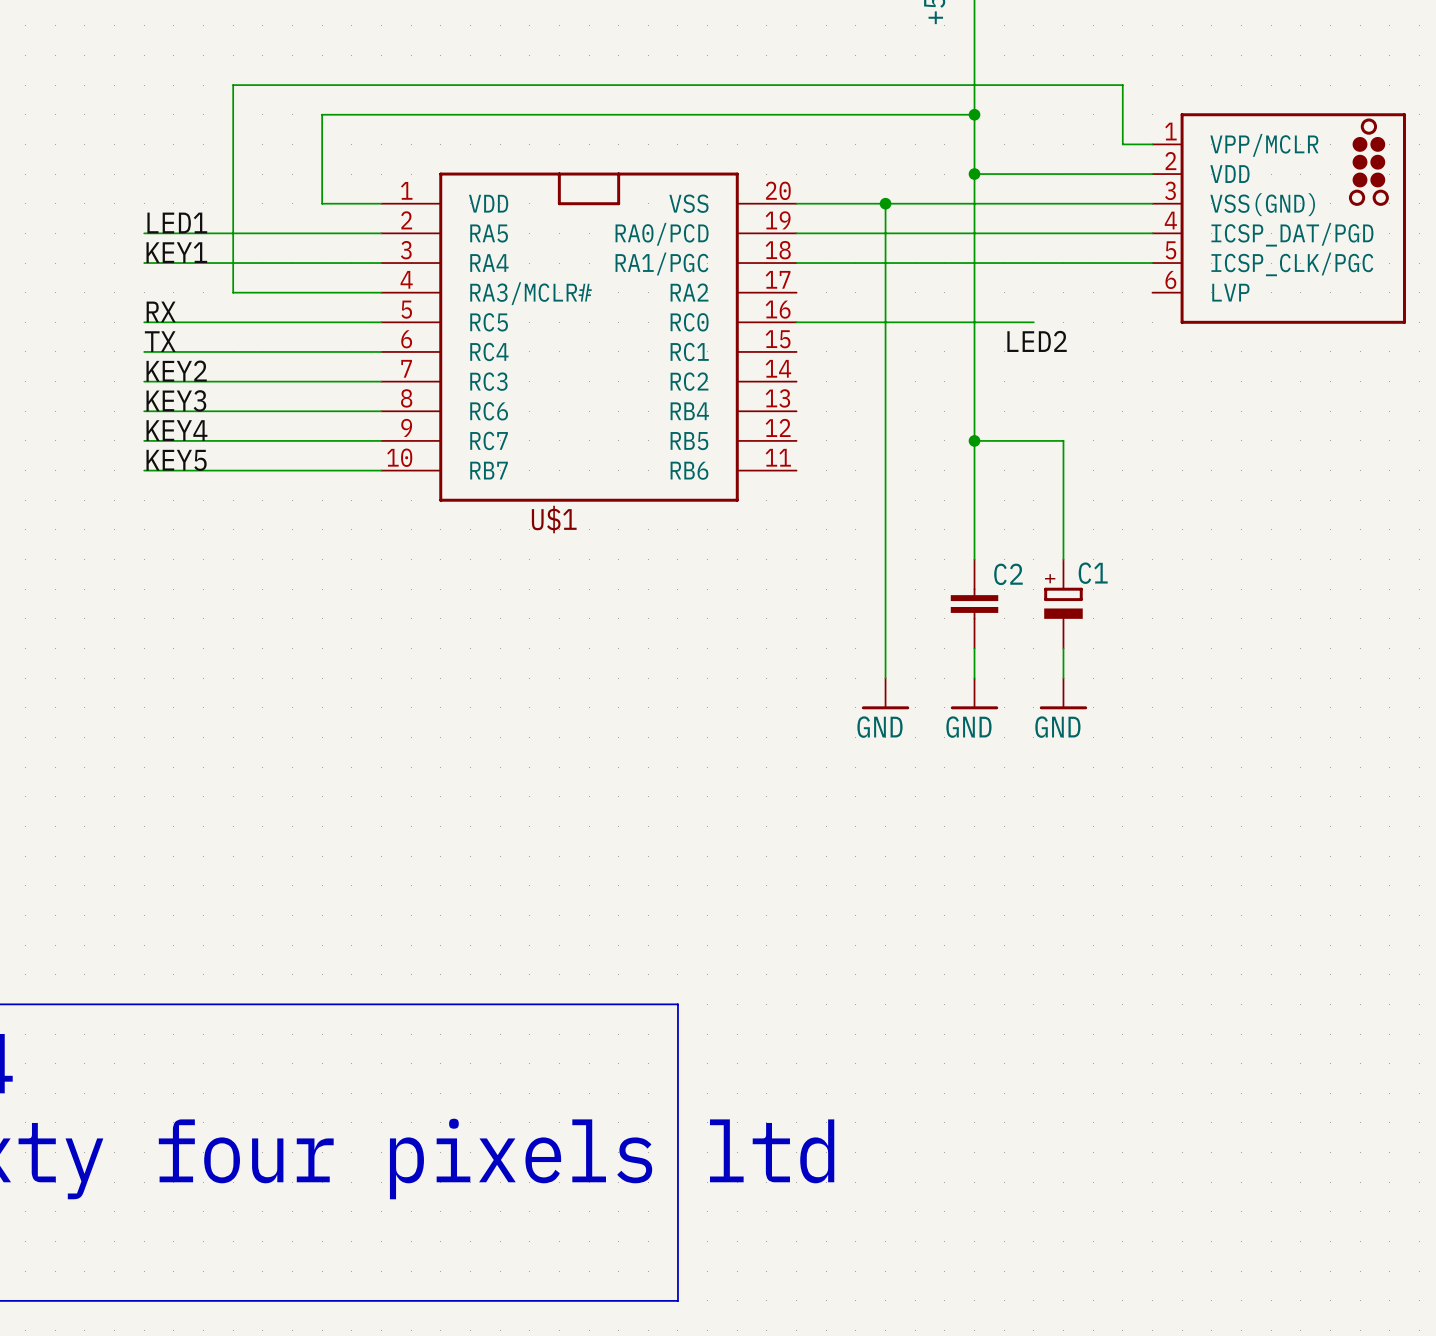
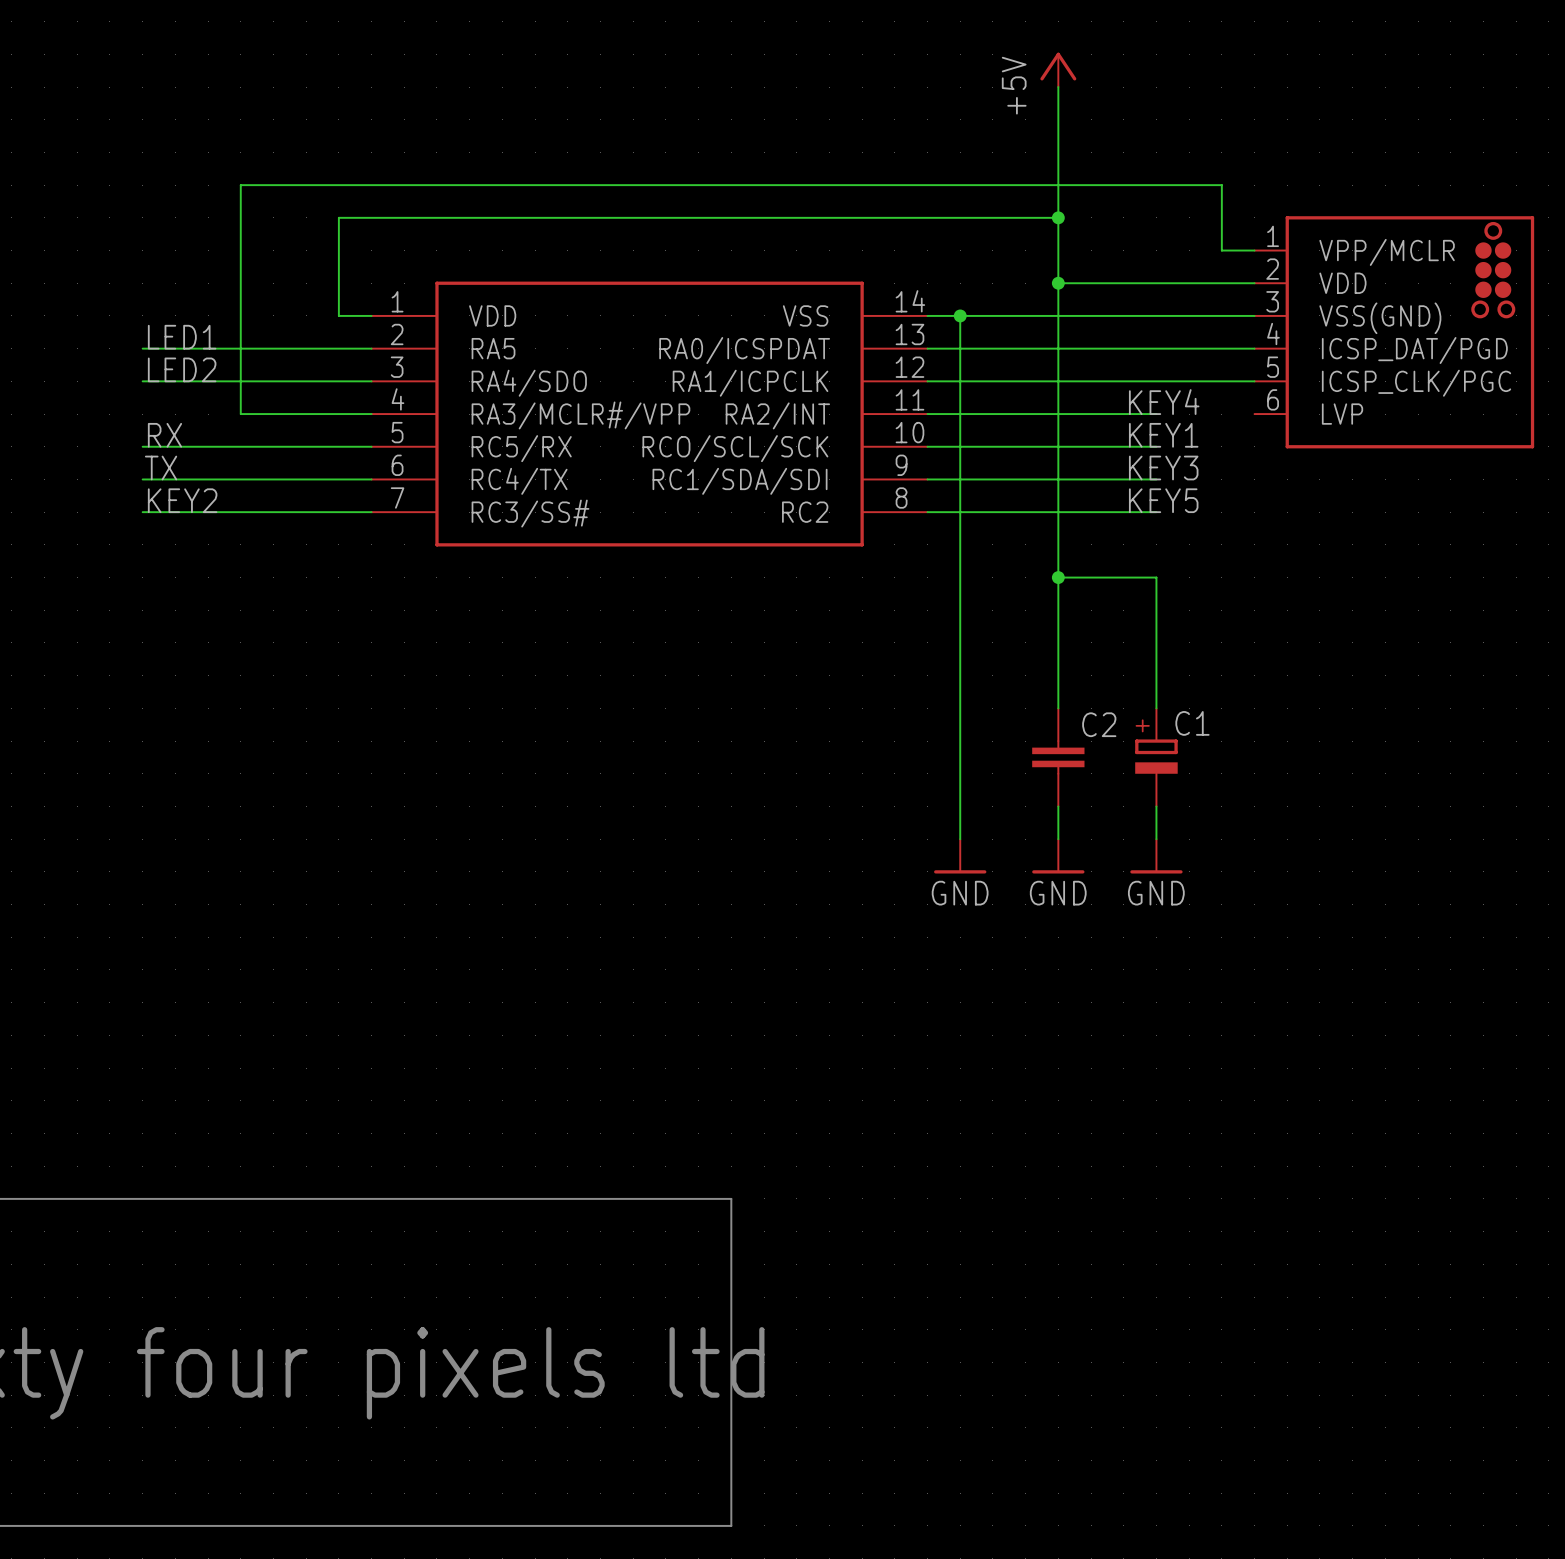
label: KEY1 (176, 252) -> LED2 (182, 369)
label: none -> KEY4 (1164, 402)
part: none -> (649, 414)
wire: none -> (927, 414) (1156, 414)
label: none -> KEY1 (1163, 435)
wire: none -> (1123, 446) (1156, 446)
U$1: (589, 337) -> none
label: LED2 (1037, 341) -> none
label: none -> KEY3 (1163, 468)
wire: none -> (927, 479) (1156, 479)
label: none -> KEY5 (1163, 500)
wire: none -> (927, 512) (1156, 512)
label: KEY3 (176, 400) -> none
wire: (144, 411) (381, 411) -> none
label: KEY4 (176, 430) -> none
wire: (144, 440) (381, 440) -> none
label: KEY5 (176, 460) -> none
wire: (144, 470) (381, 470) -> none

